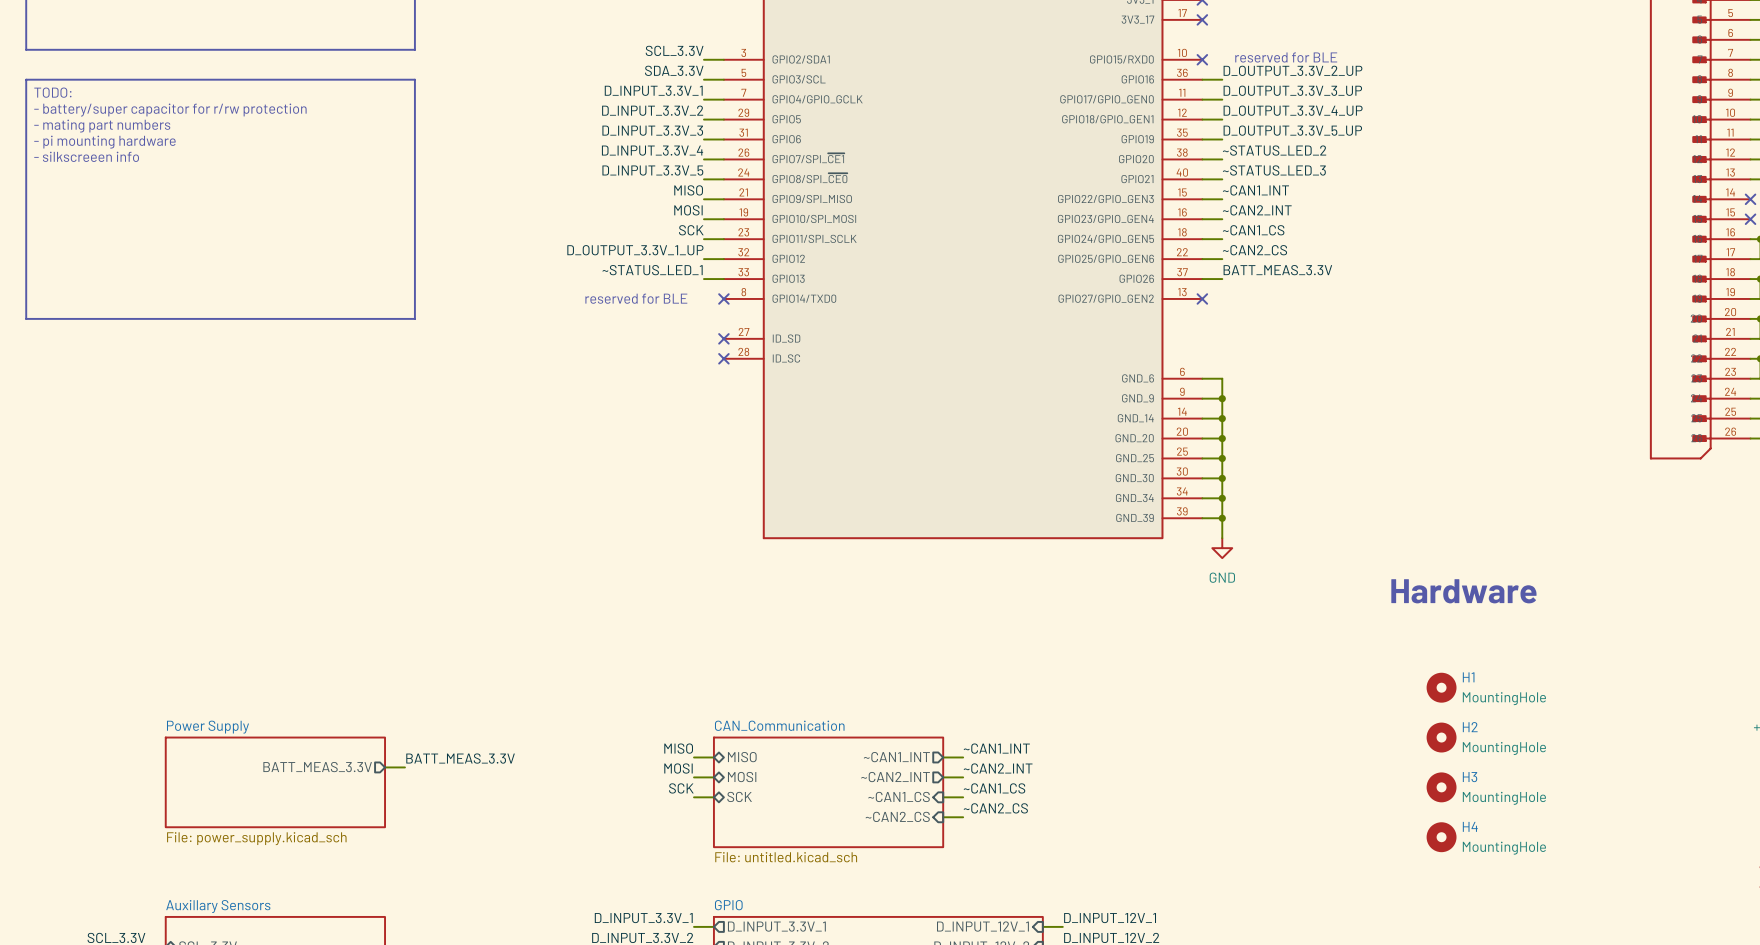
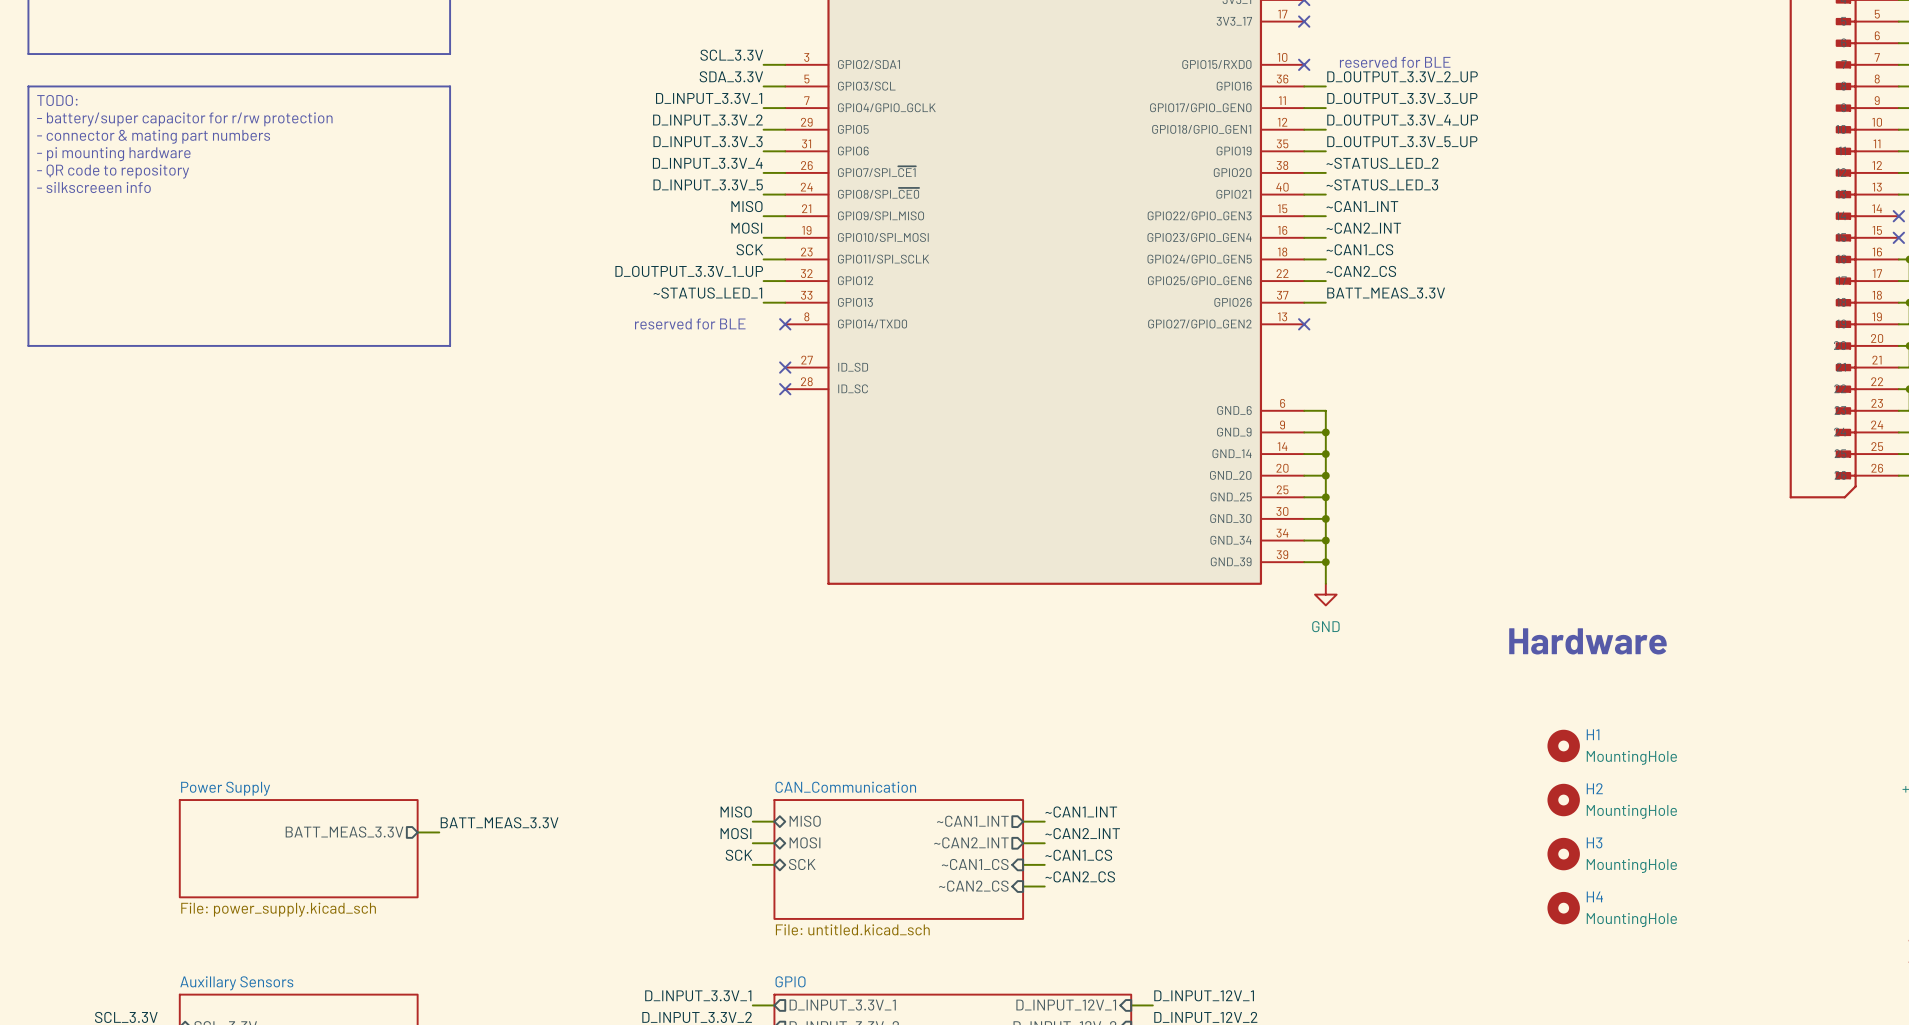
text: - mating part numbers (102, 126) -> - connector & mating part numbers (153, 136)
text: - silkscreeen info (86, 156) -> - QR code to repository (113, 171)
text: none -> - silkscreeen info (93, 187)

